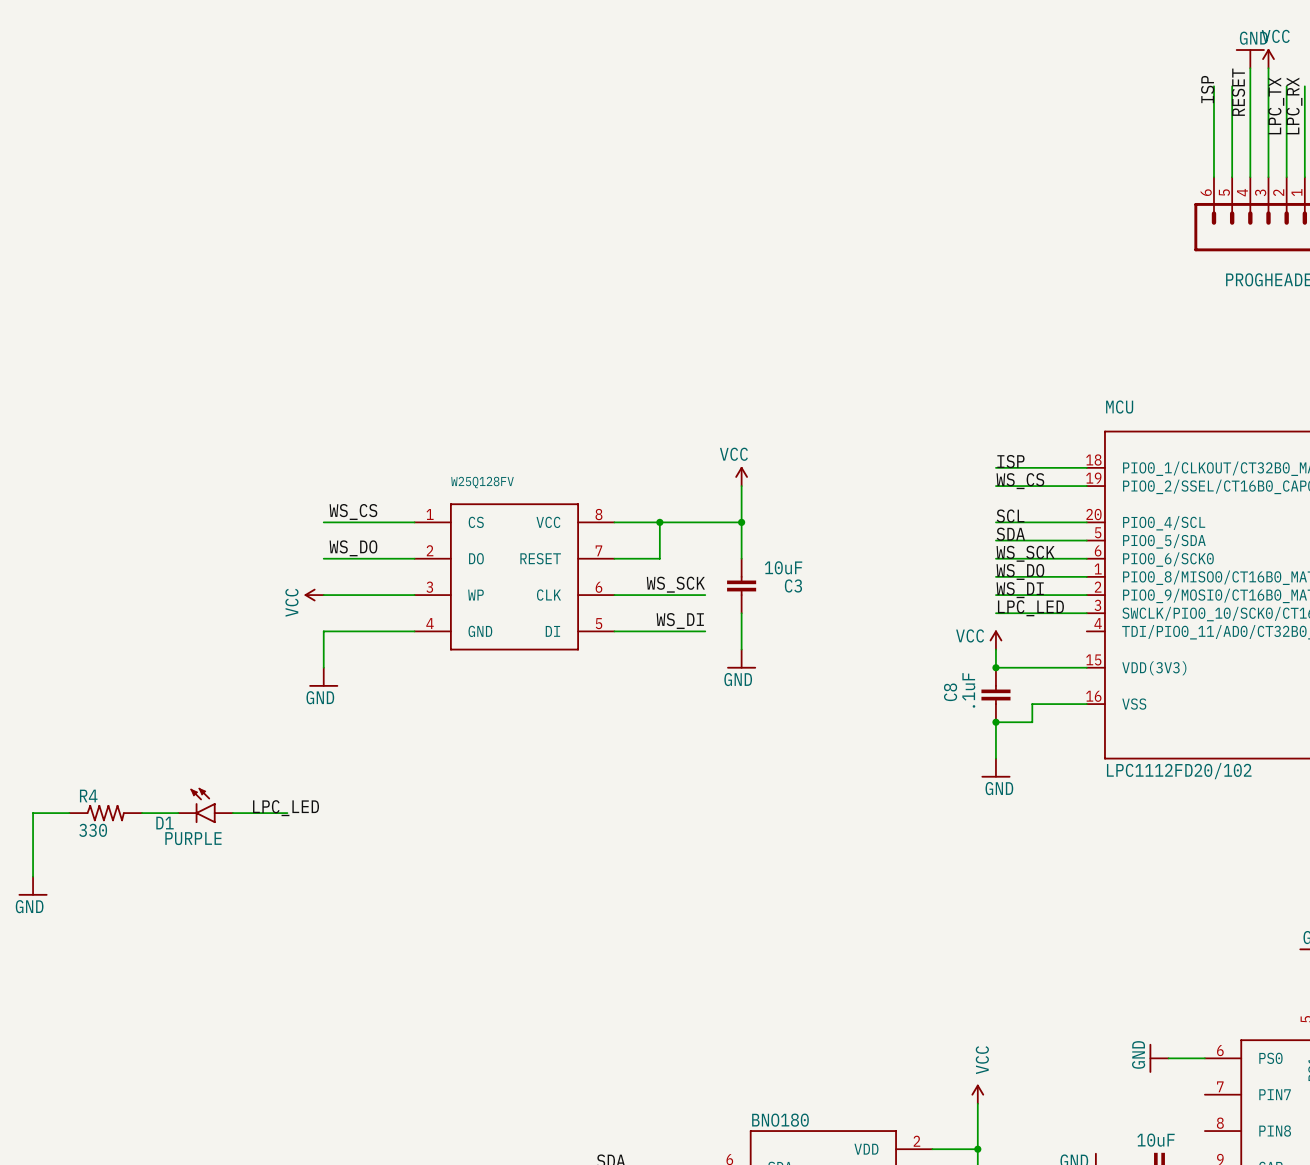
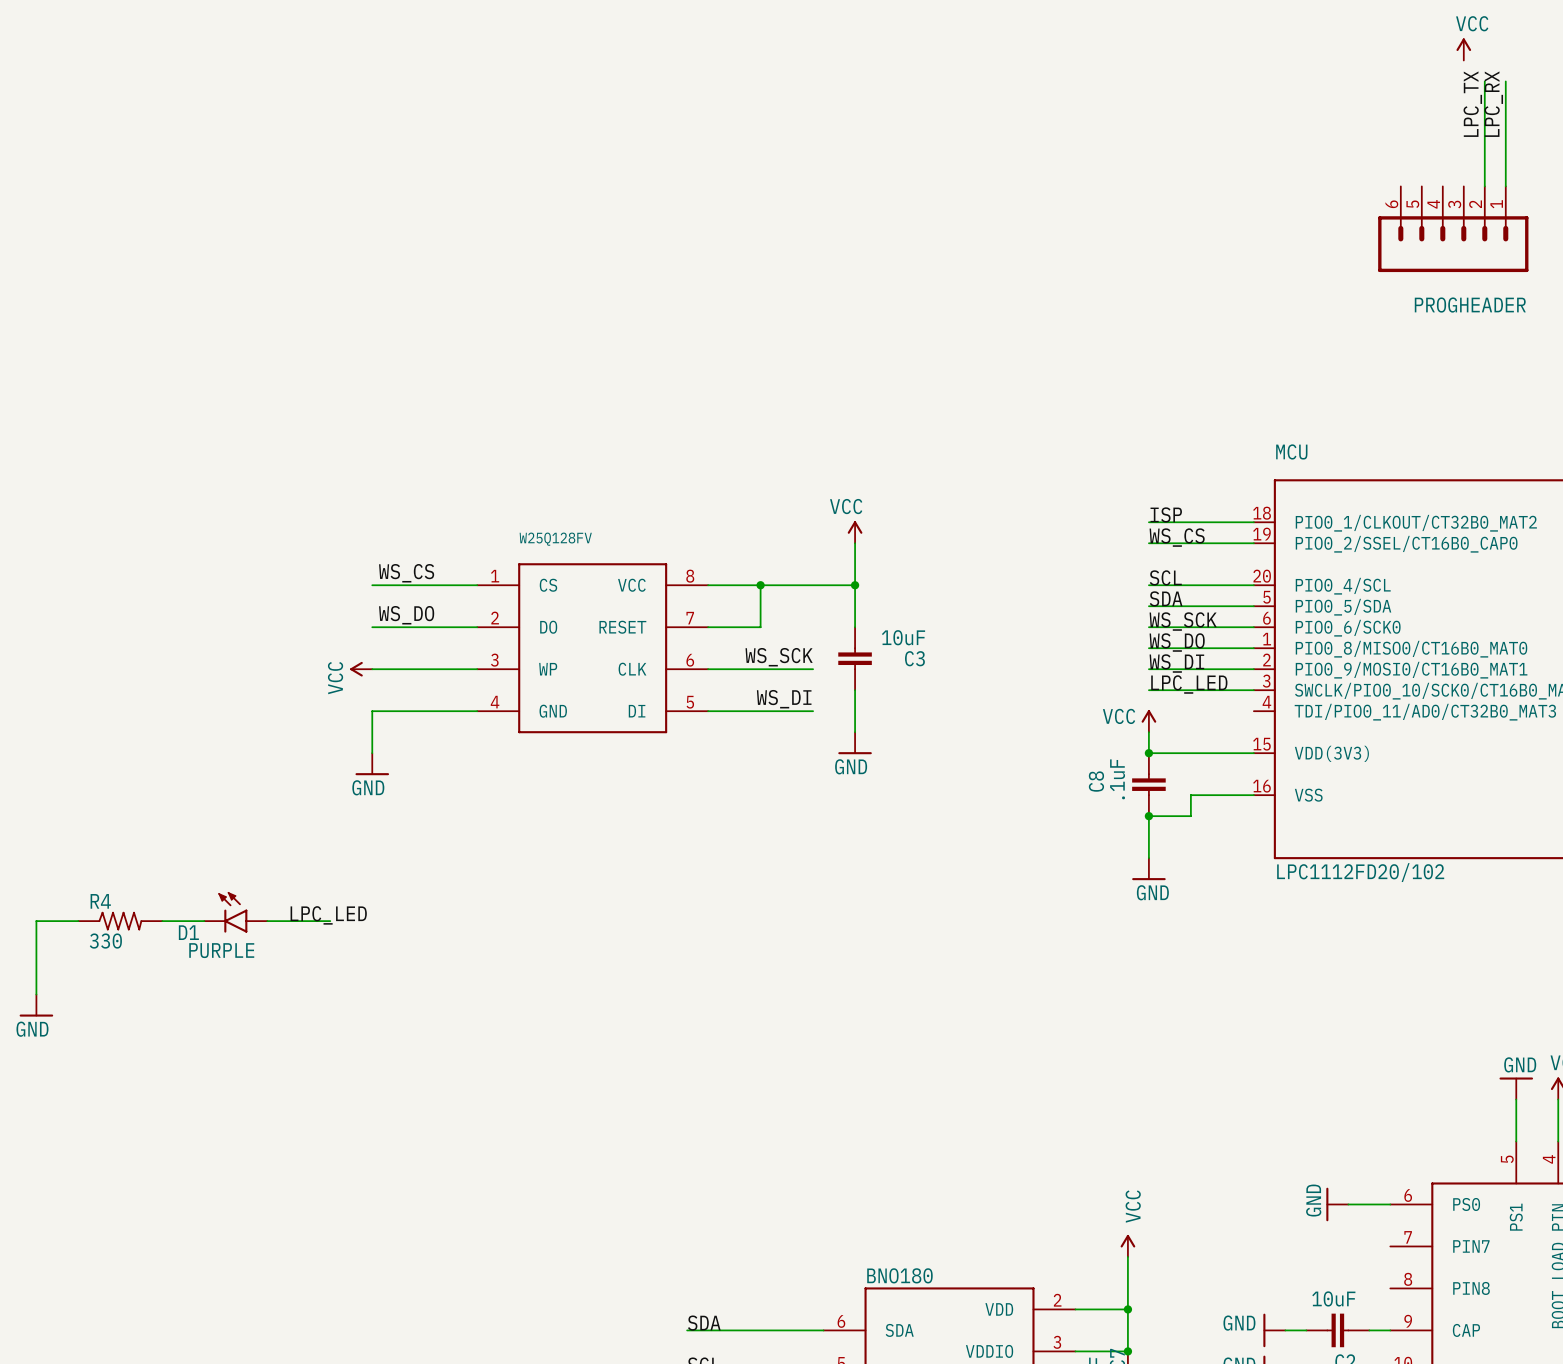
power symbol: GND (1250, 58) -> none
wire: (1250, 68) (1250, 177) -> none
wire: (1268, 68) (1268, 177) -> none
wire: (1213, 86) (1213, 177) -> none
wire: (1232, 86) (1232, 177) -> none
label: ISP (1207, 89) -> none
label: RESET (1238, 92) -> none

